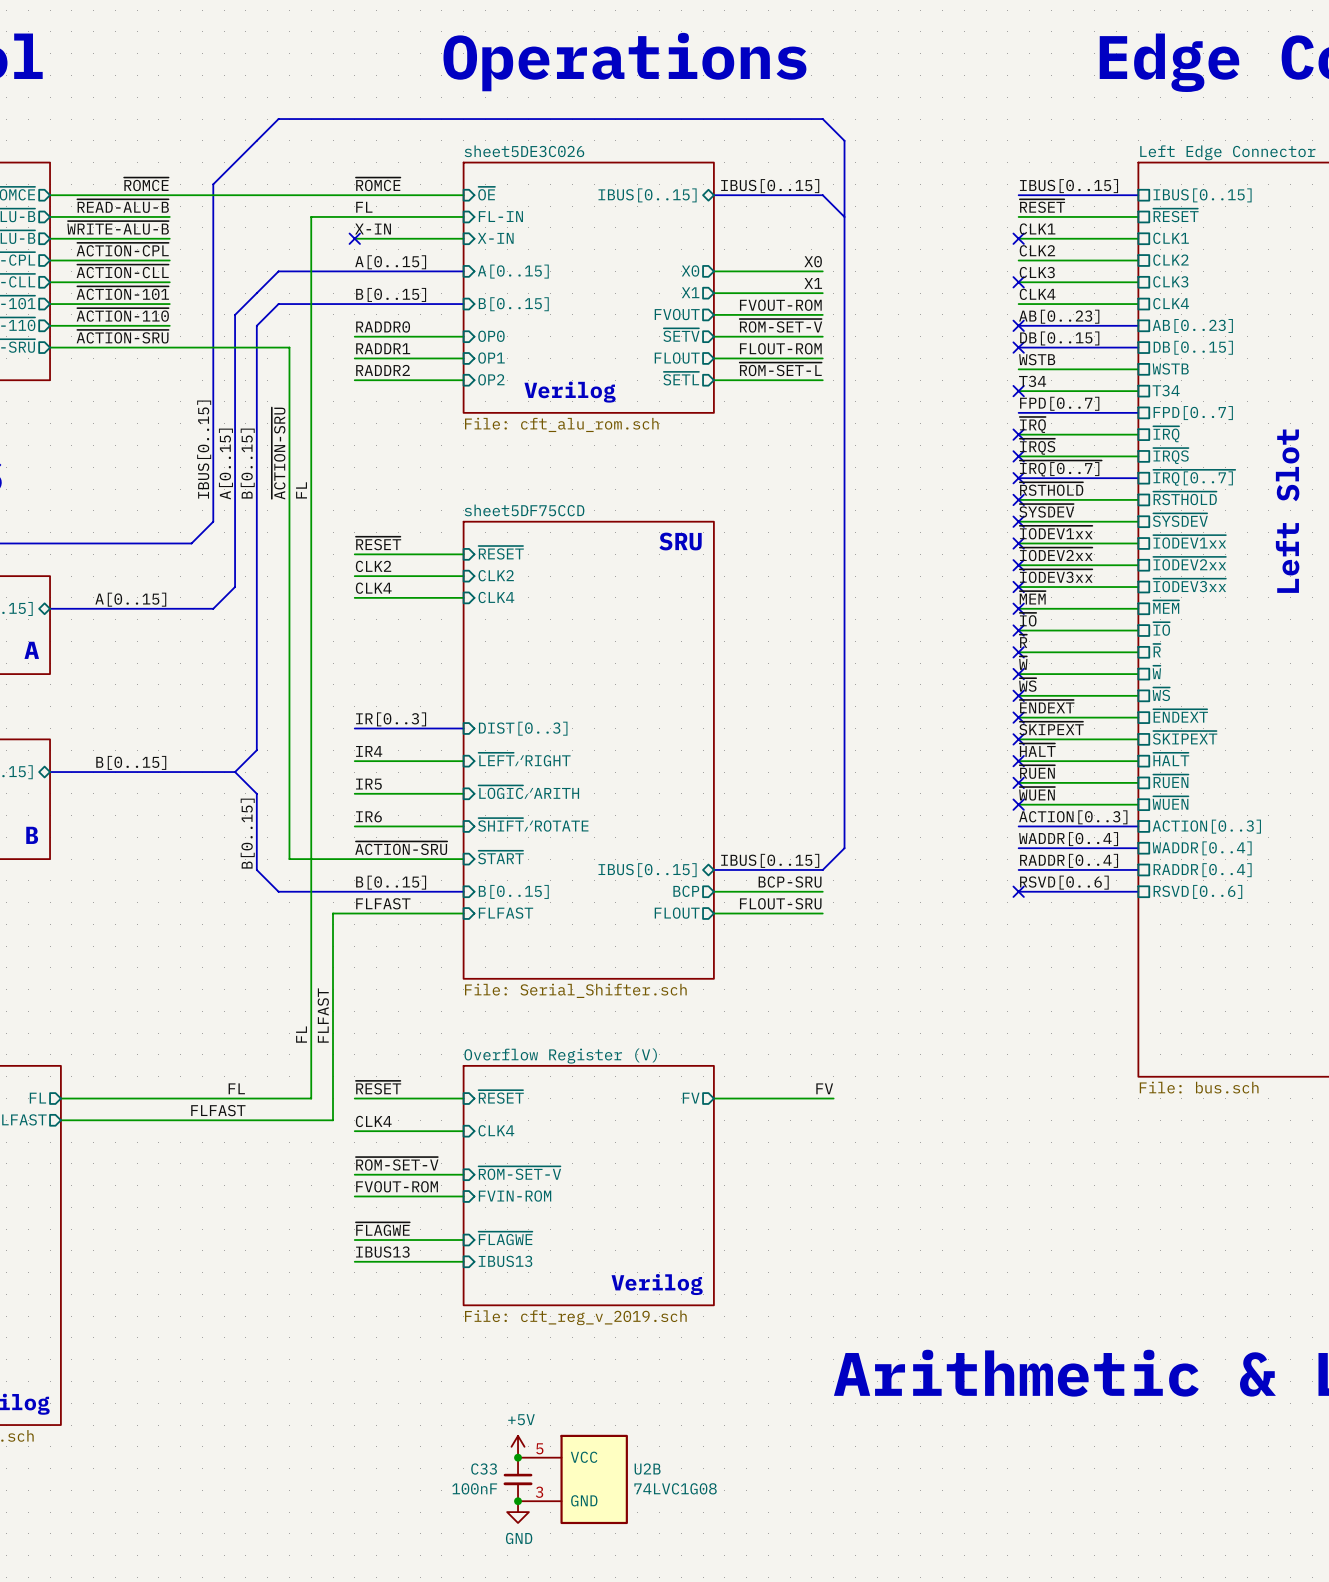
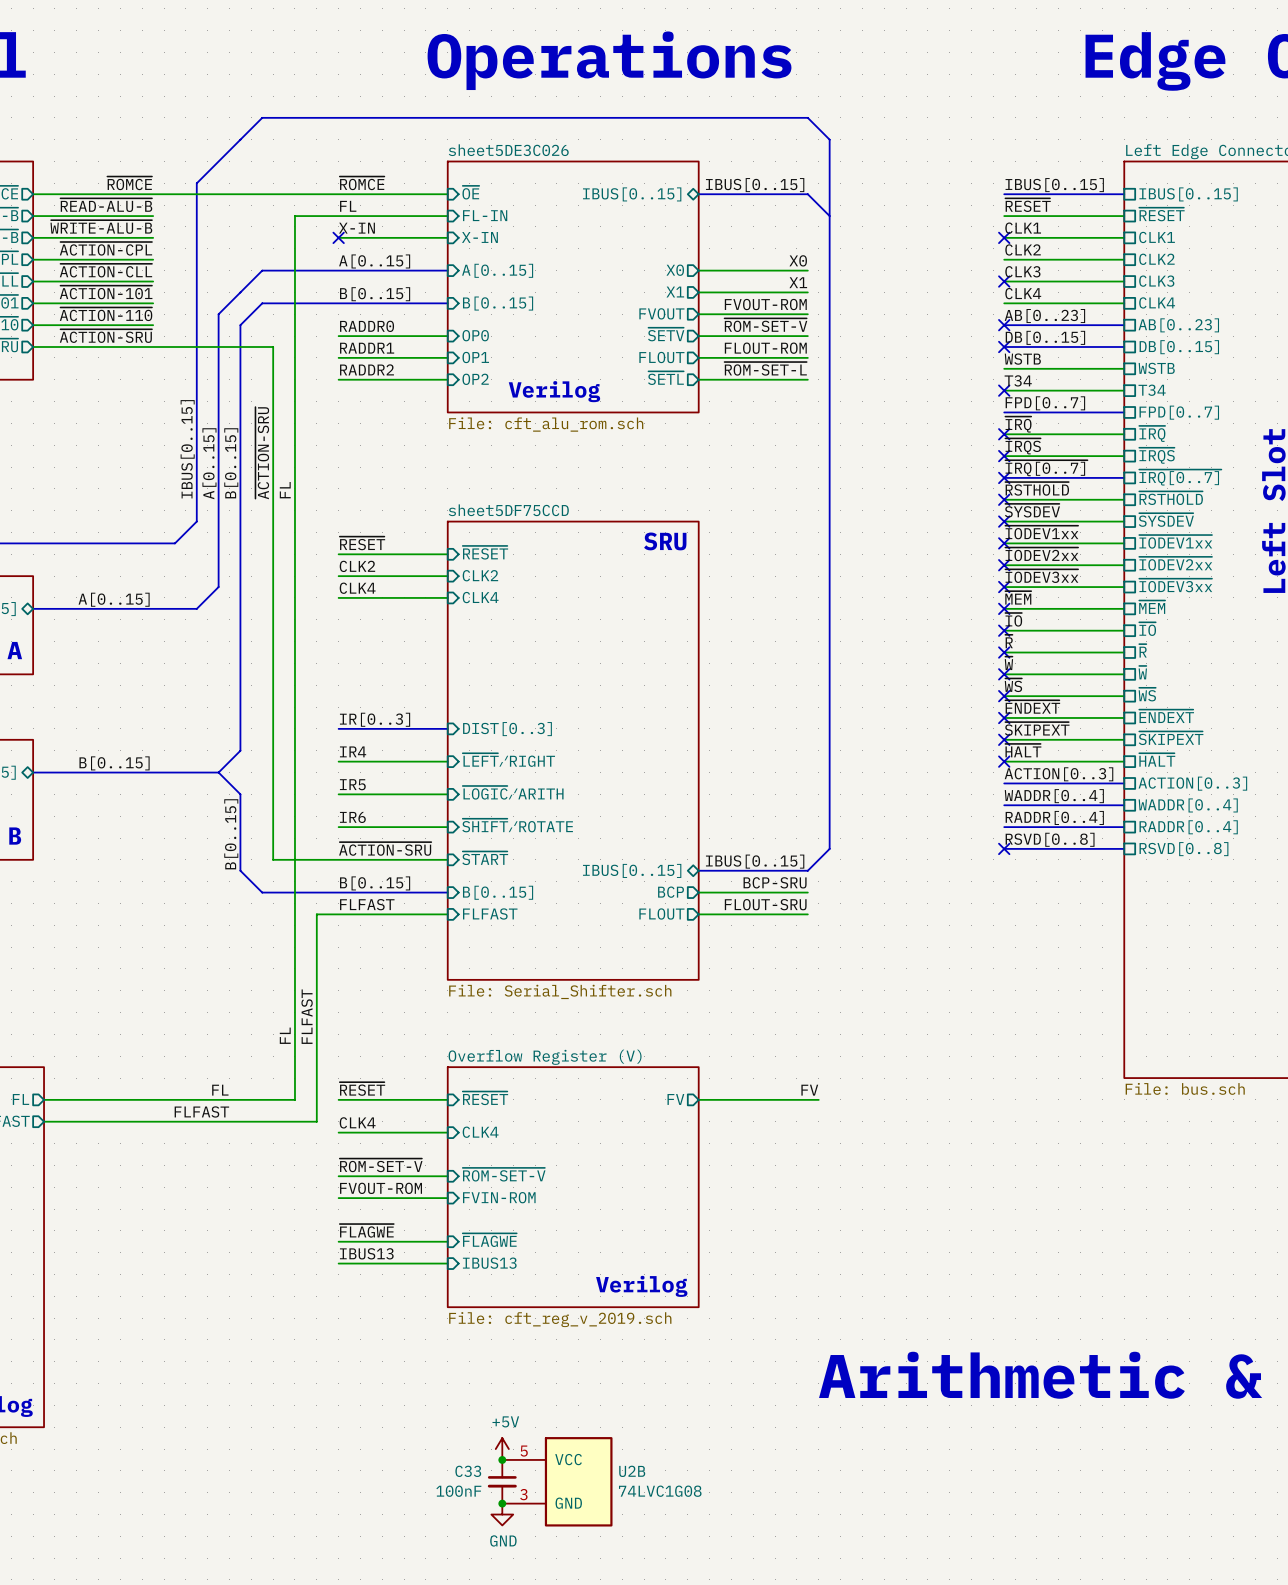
label: ~{RUEN} (1037, 772) -> ACTION[0..3] (1058, 774)
sheet pin: ~{RUEN} (1170, 781) -> ACTION[0..3] (1192, 783)
no-connect mark: (1018, 782) -> none
label: ~{WUEN} (1037, 793) -> WADDR[0..4] (1054, 796)
sheet pin: ~{WUEN} (1170, 803) -> WADDR[0..4] (1188, 805)
no-connect mark: (1018, 804) -> none
label: ACTION[0..3] (1073, 817) -> RADDR[0..4] (1054, 817)
sheet pin: ACTION[0..3] (1206, 826) -> RADDR[0..4] (1188, 827)
label: WADDR[0..4] (1068, 839) -> RSVD[0..8] (1050, 839)
no-connect mark: none -> (1004, 848)
sheet pin: WADDR[0..4] (1202, 848) -> RSVD[0..8] (1183, 849)
label: RADDR[0..4] (1069, 860) -> none
bus: (1018, 869) (1138, 869) -> (1004, 783) (1124, 783)
sheet pin: RADDR[0..4] (1202, 870) -> none
label: RSVD[0..6] (1064, 882) -> none
bus: (1018, 891) (1138, 891) -> (1004, 805) (1124, 805)
no-connect mark: (1018, 891) -> none
sheet pin: RSVD[0..6] (1197, 891) -> none

